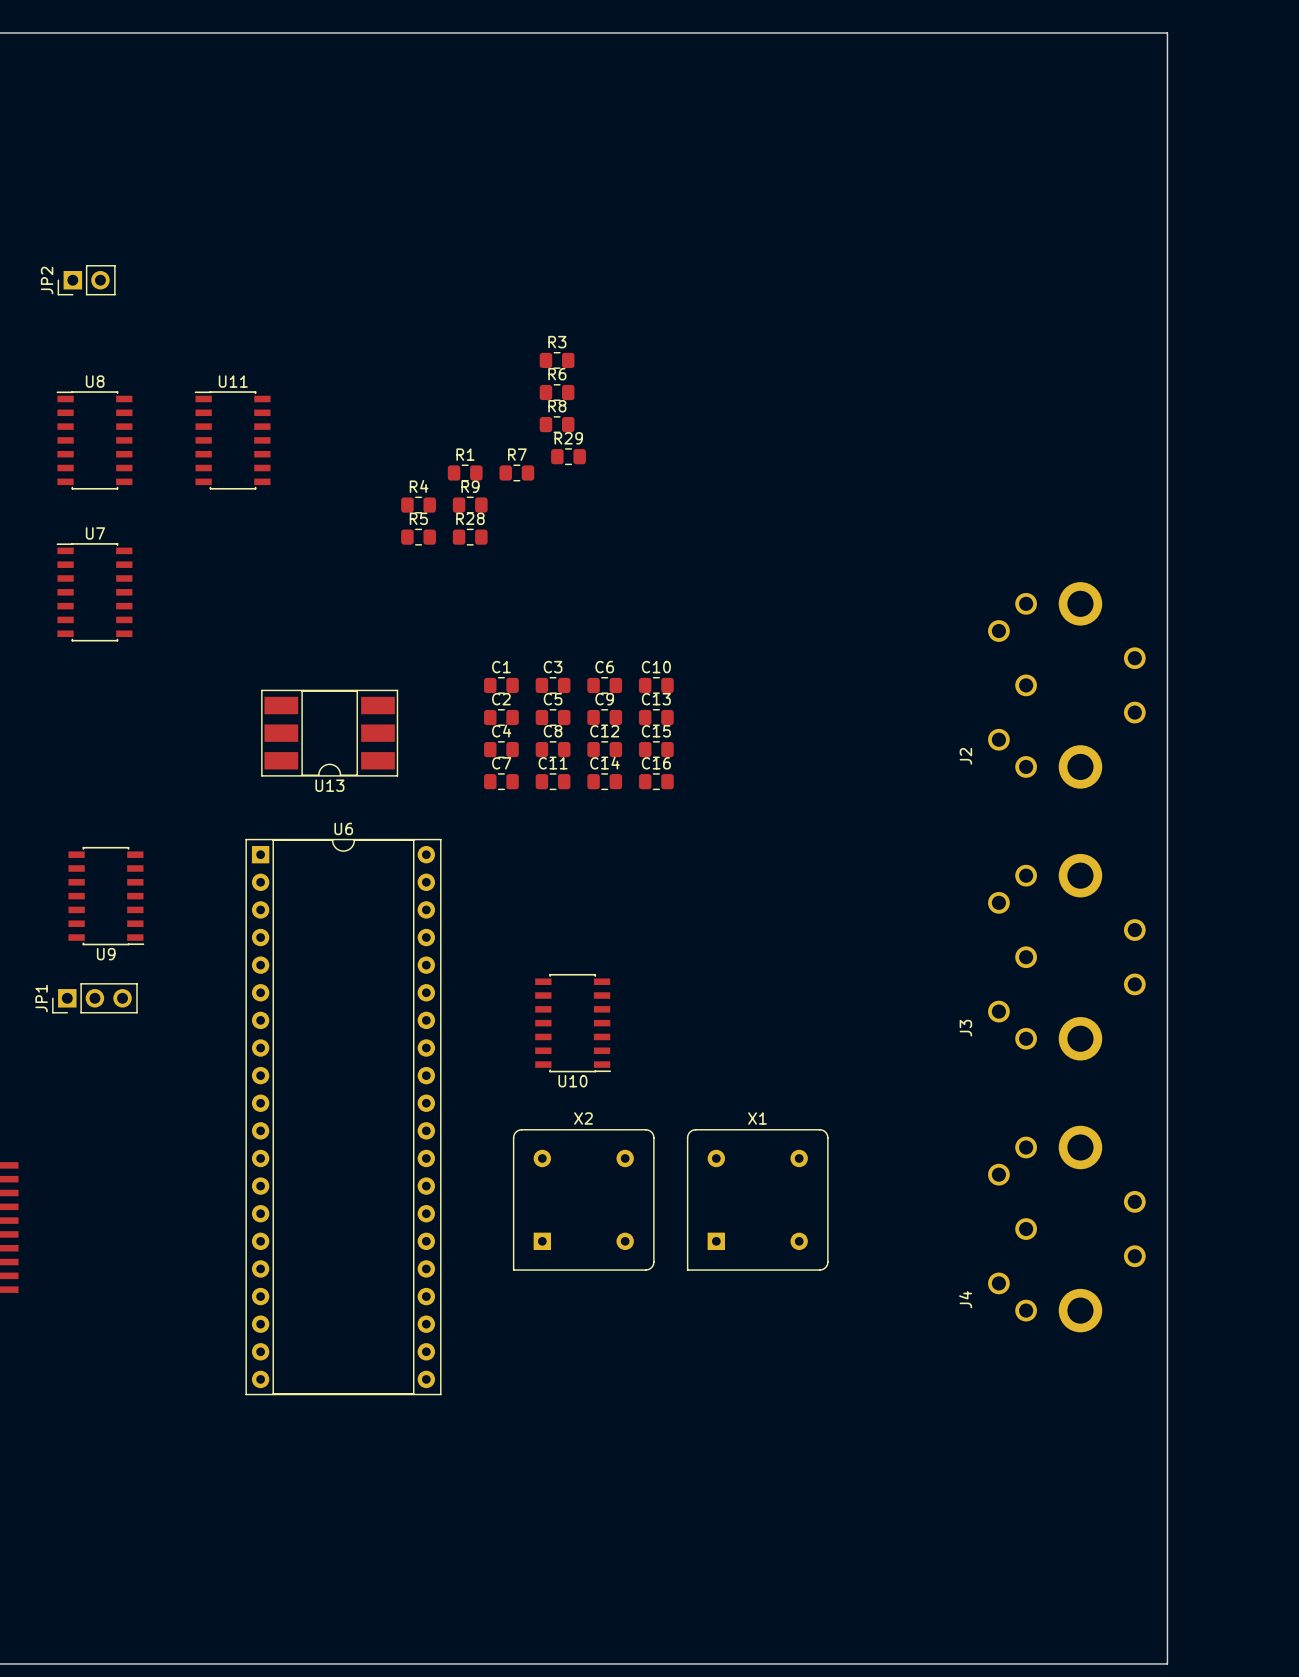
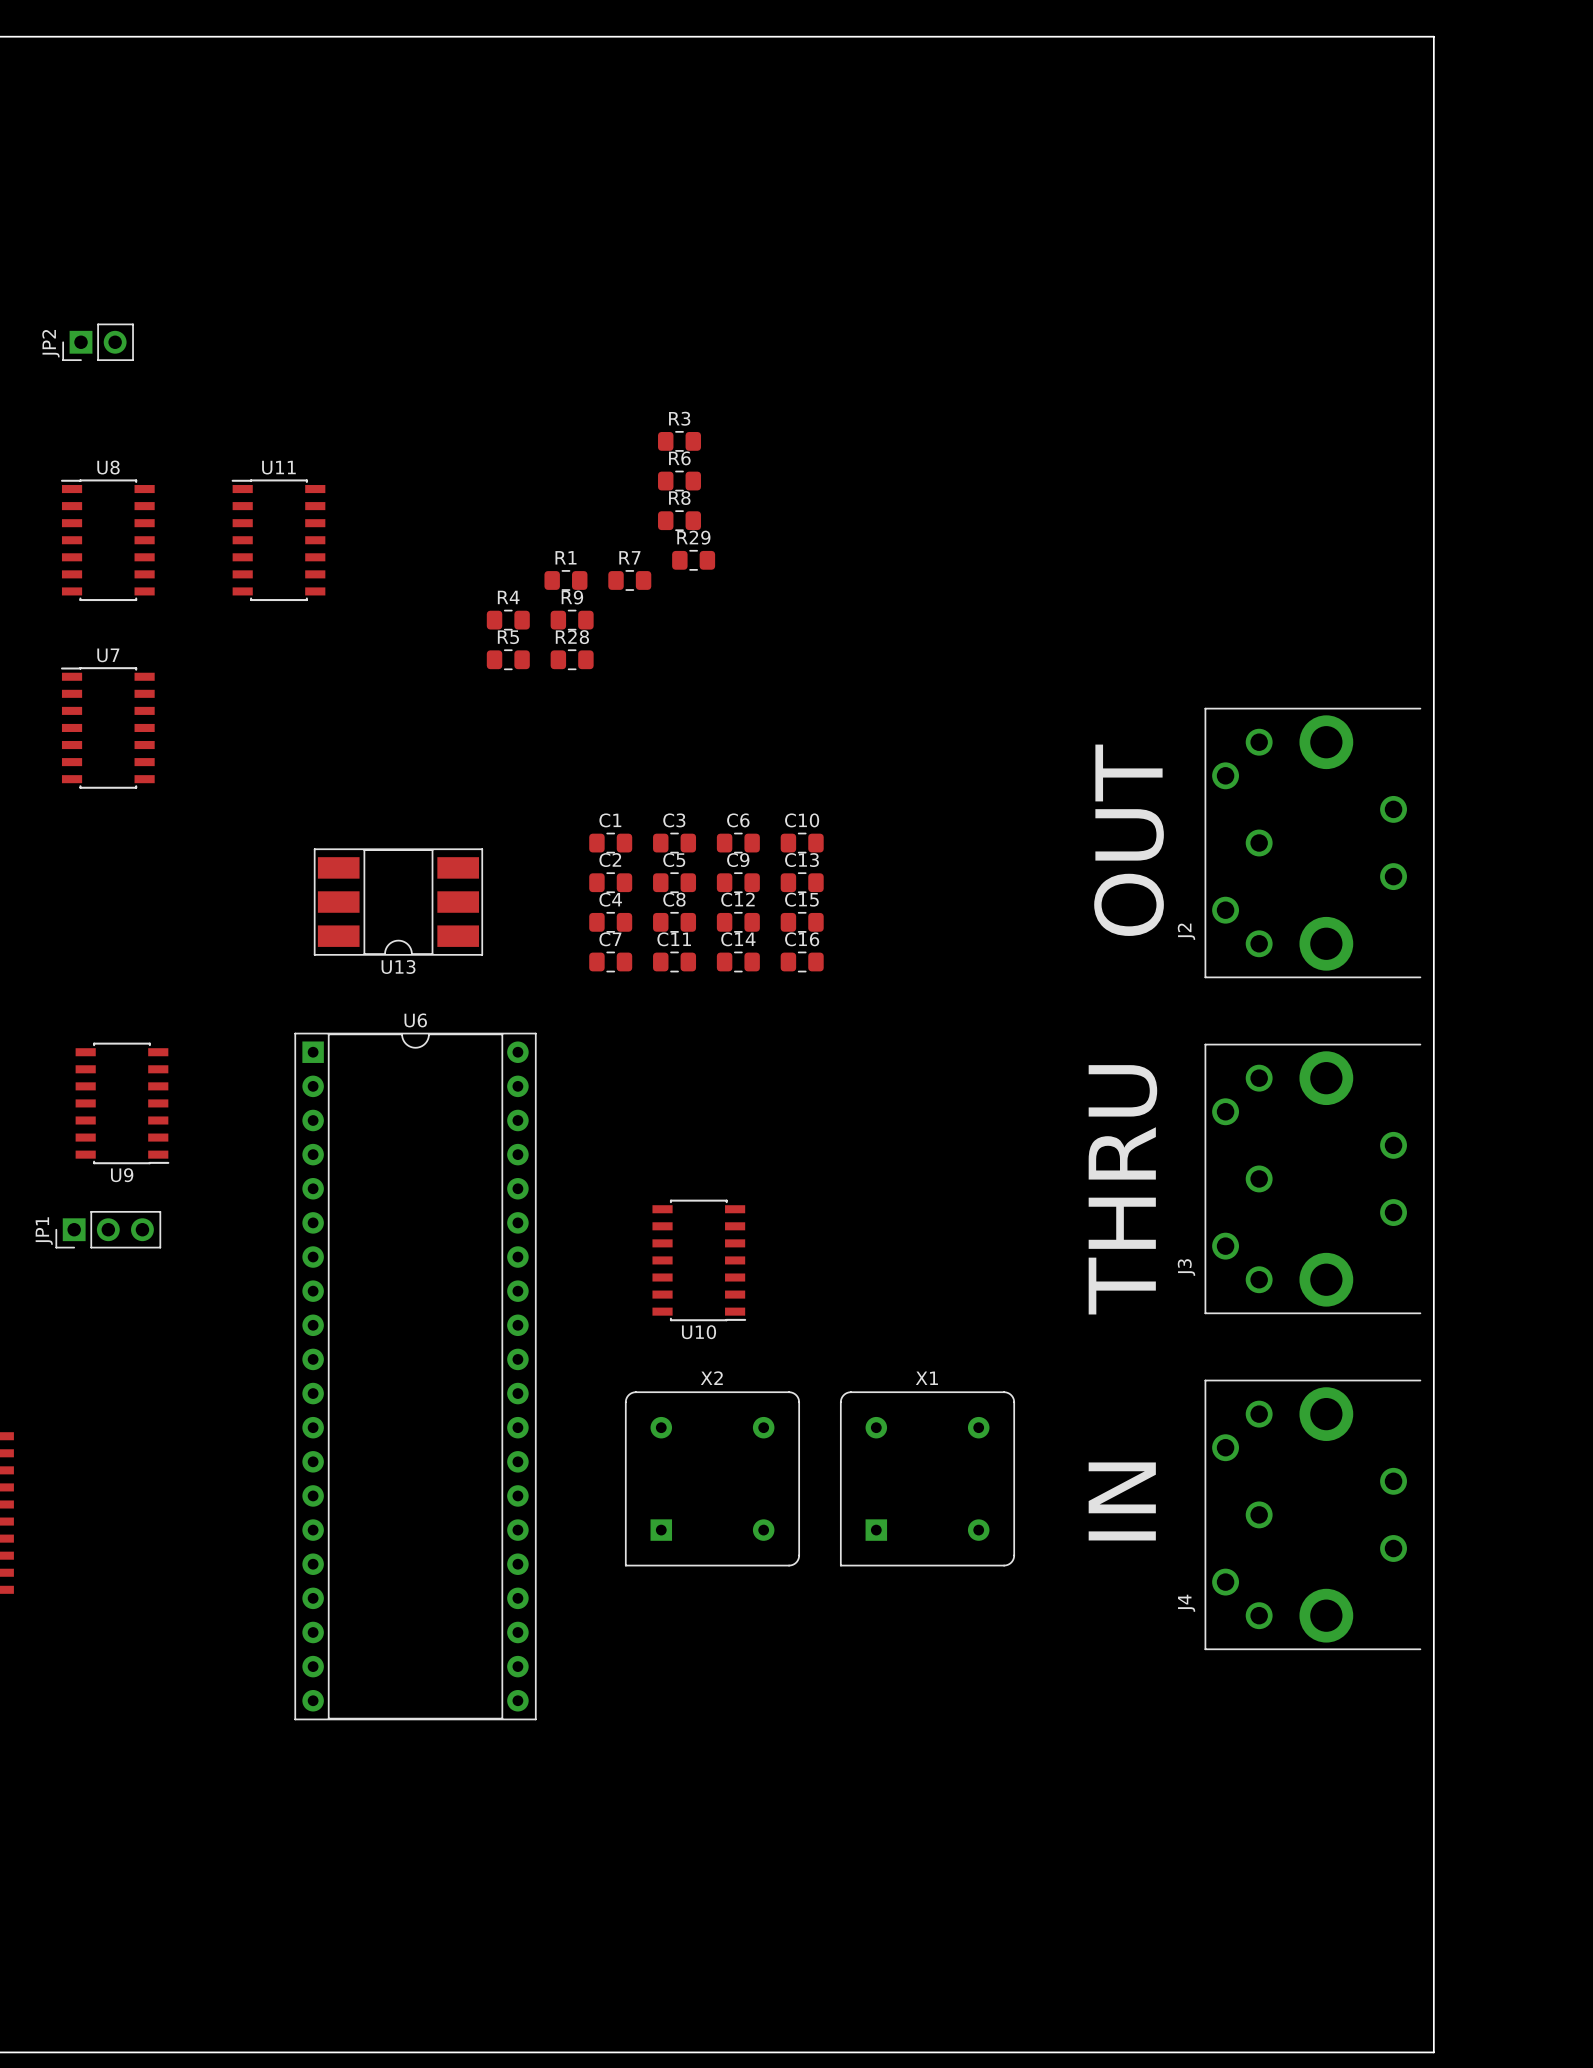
J2 footprint: [988, 582, 1146, 789] -> [1204, 707, 1422, 979]
text: none -> OUT (1129, 840)
J3 footprint: [988, 853, 1146, 1061] -> [1204, 1043, 1422, 1315]
text: none -> THRU (1122, 1189)
J4 footprint: [988, 1125, 1146, 1333] -> [1204, 1379, 1422, 1651]
text: none -> IN (1122, 1501)

